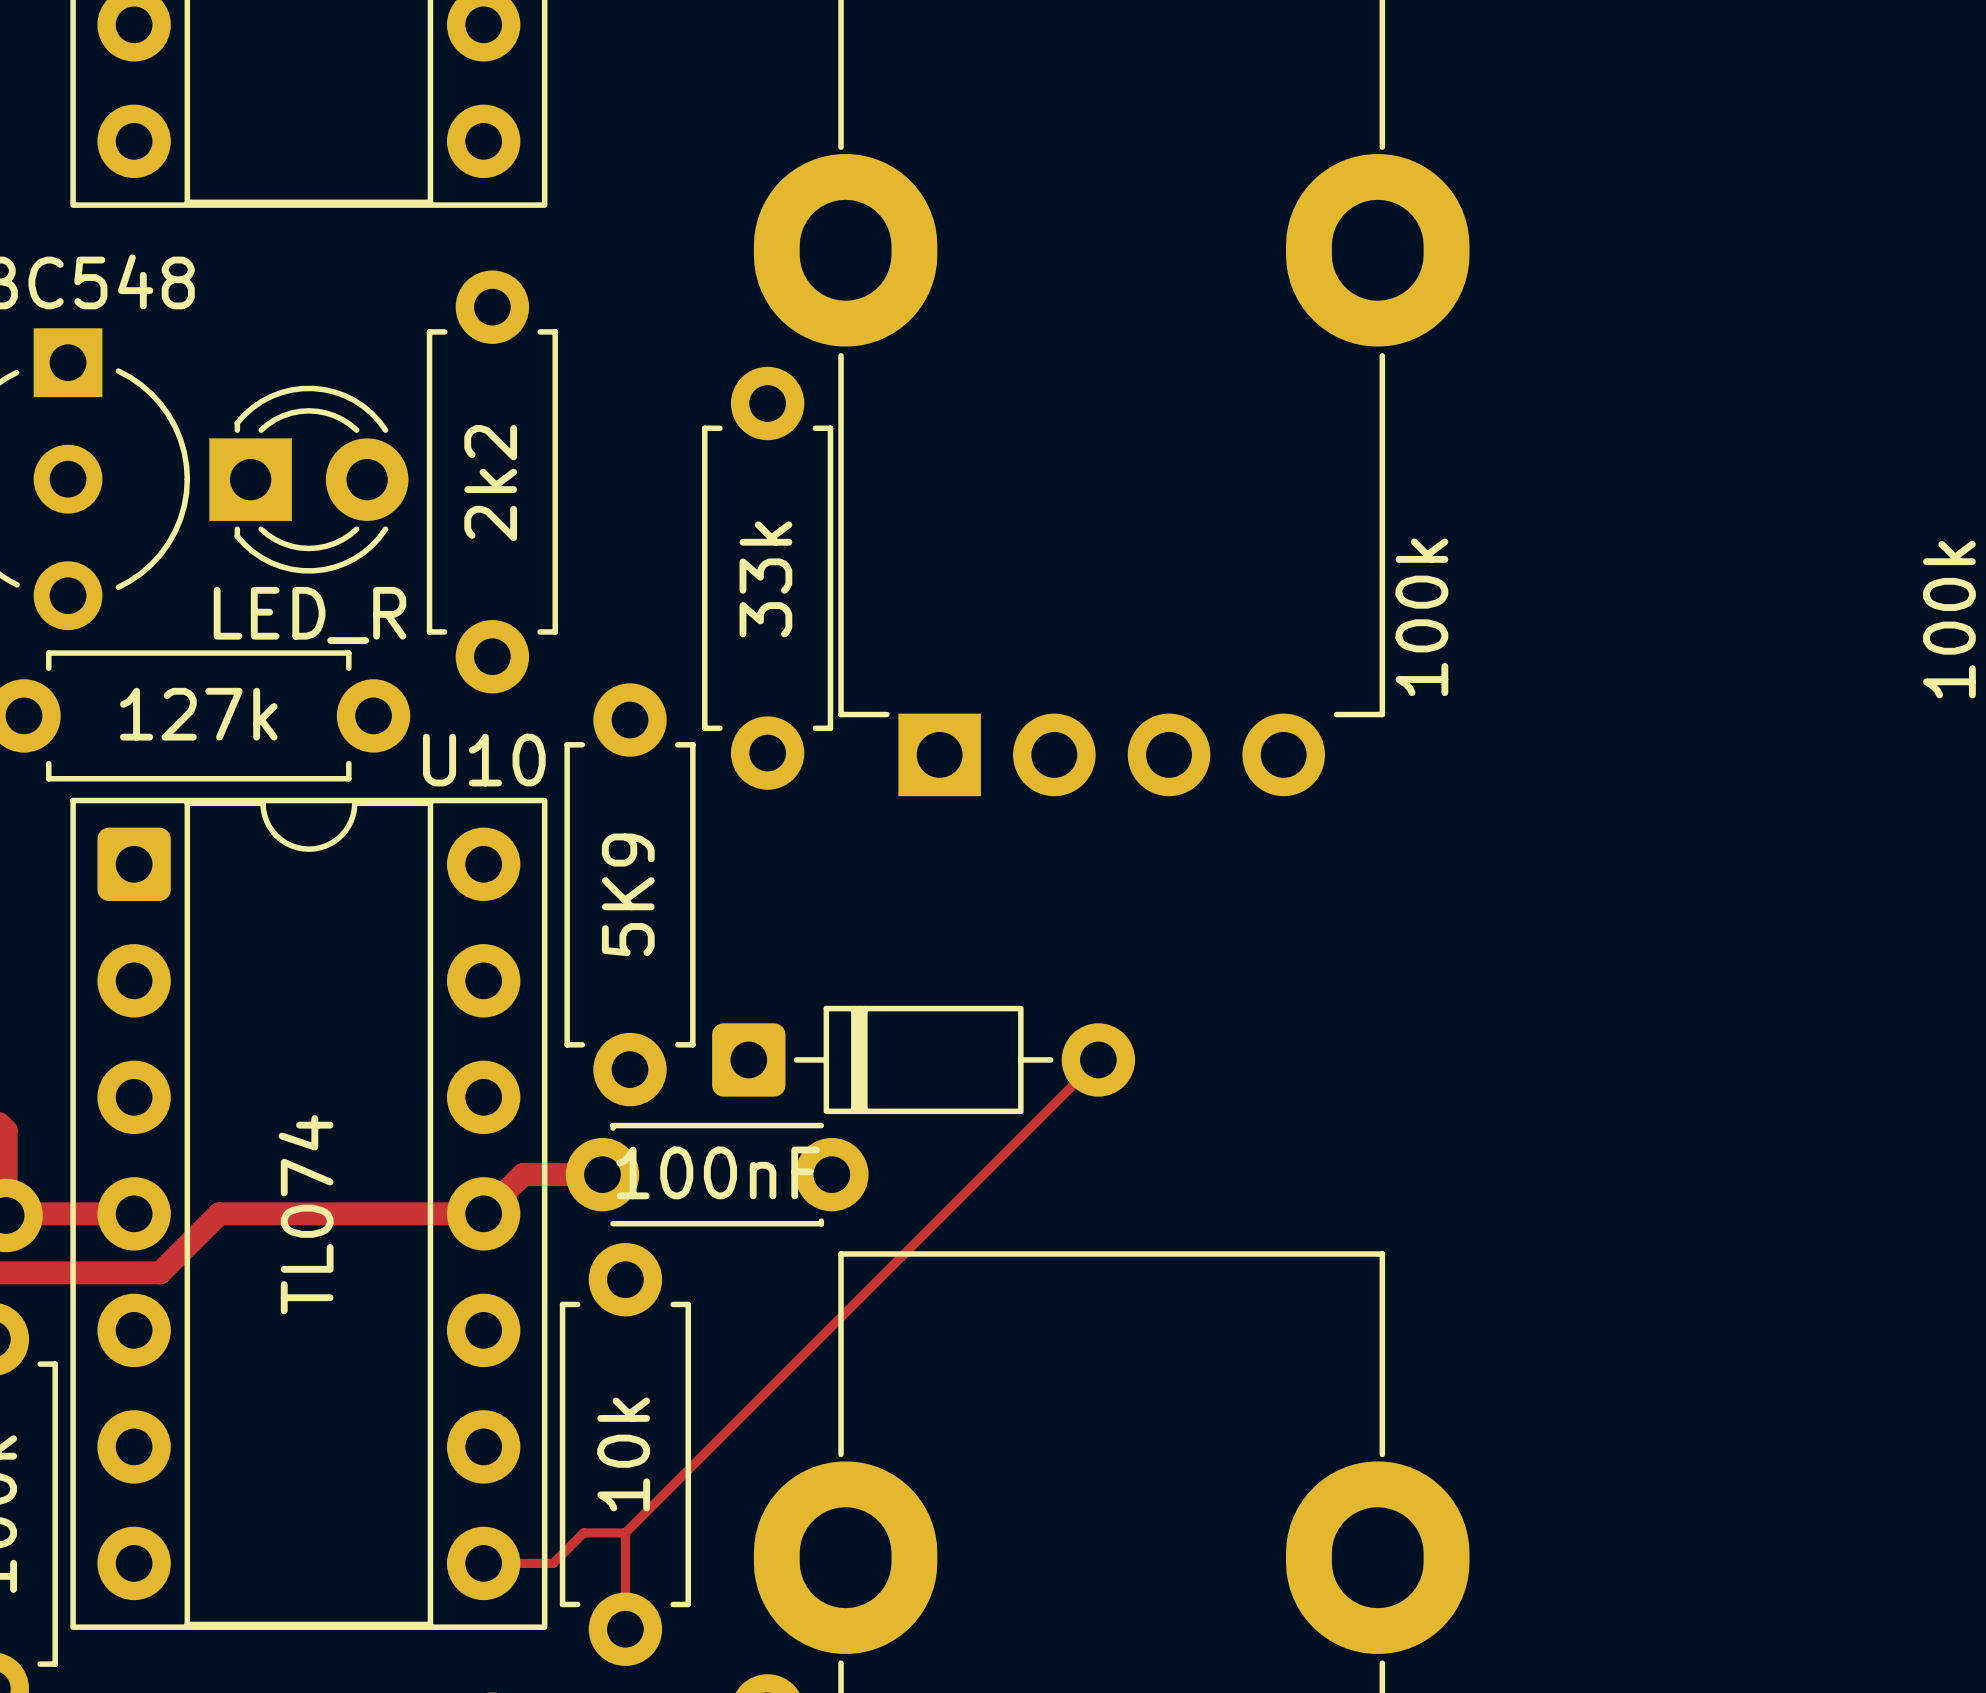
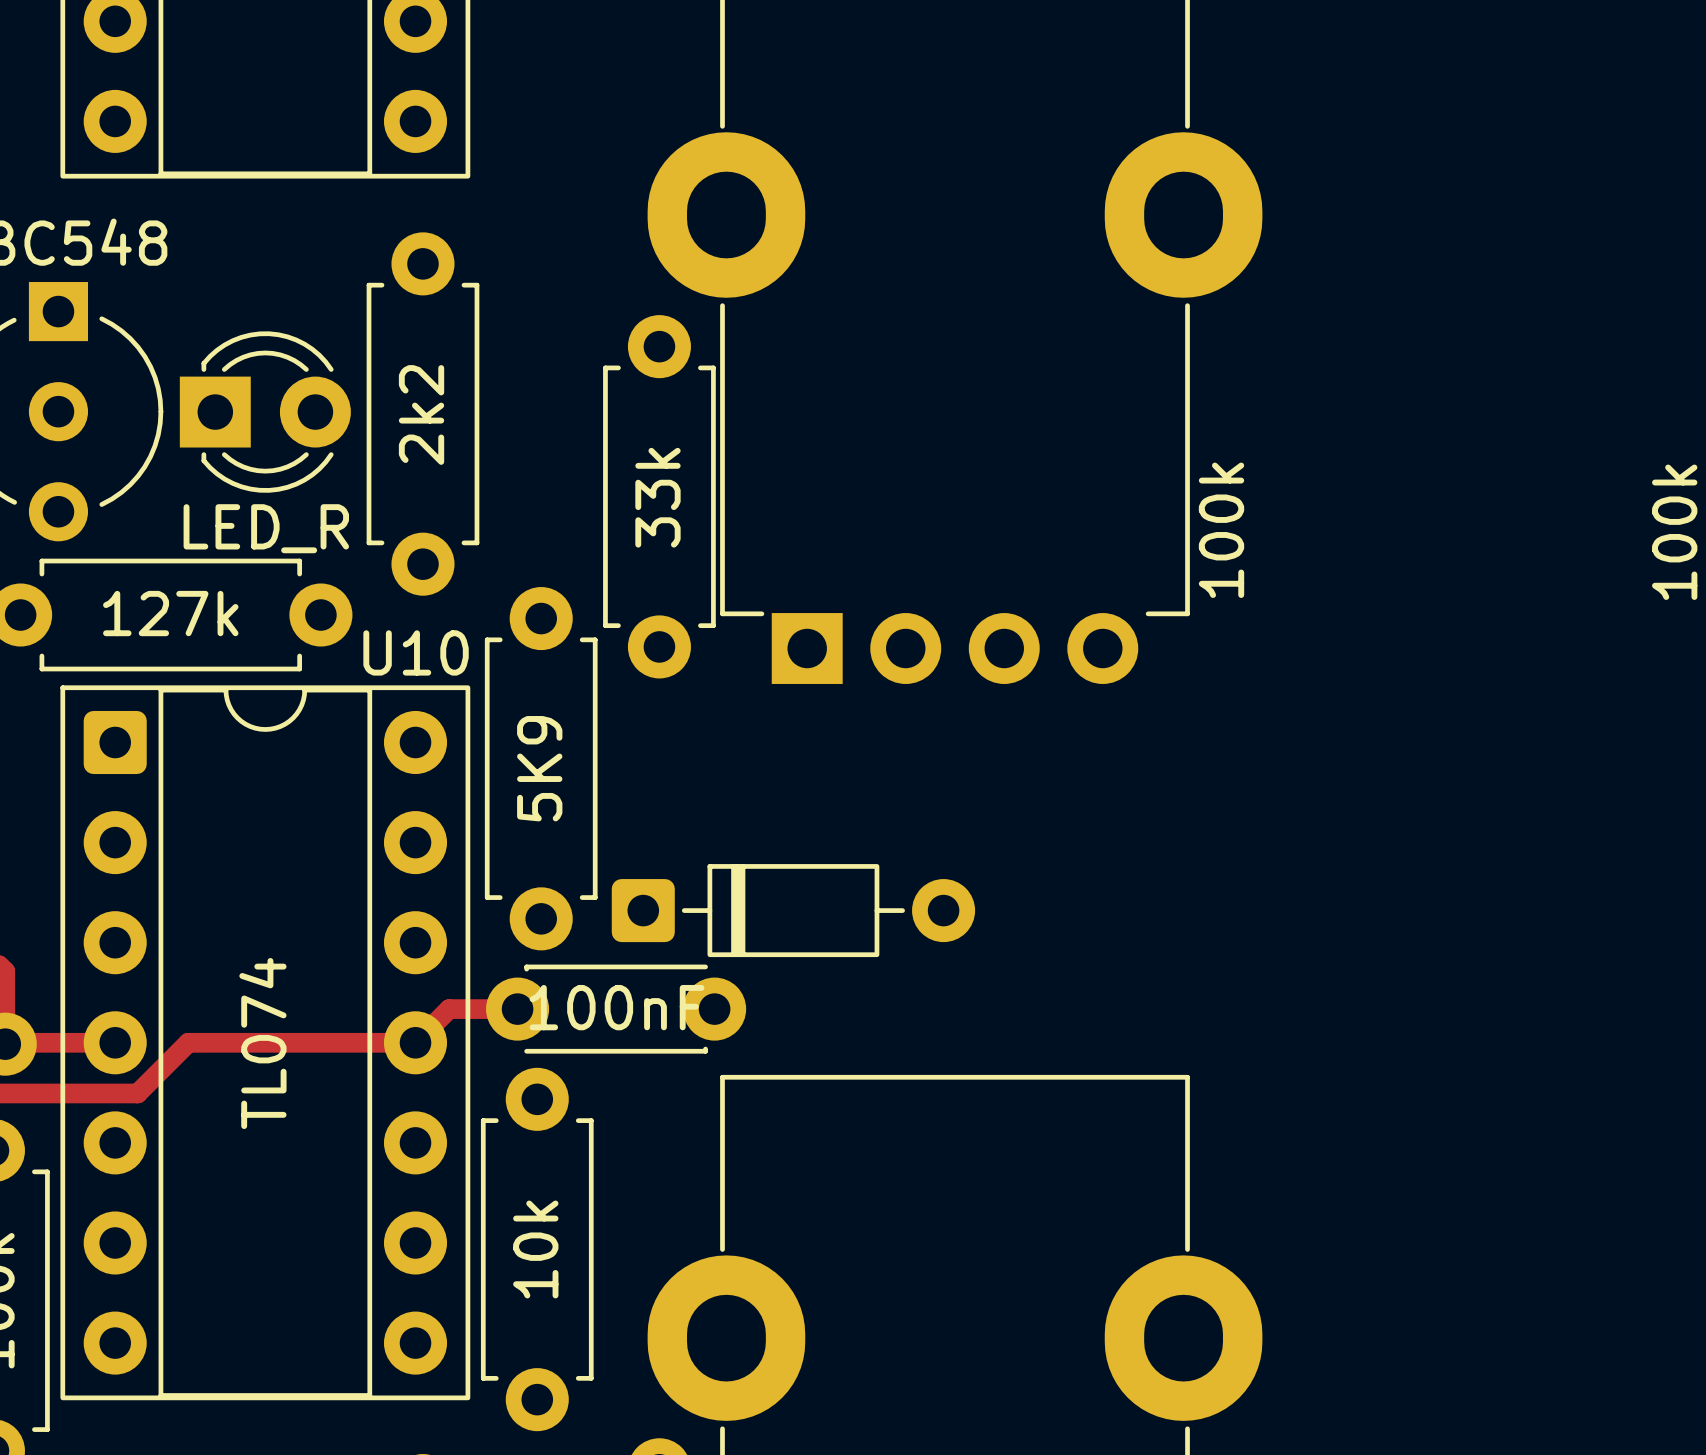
track: (1098, 1059) (625, 1532) -> none
track: (625, 1532) (625, 1629) -> none
track: (625, 1532) (583, 1532) (553, 1563) (483, 1563) -> none

